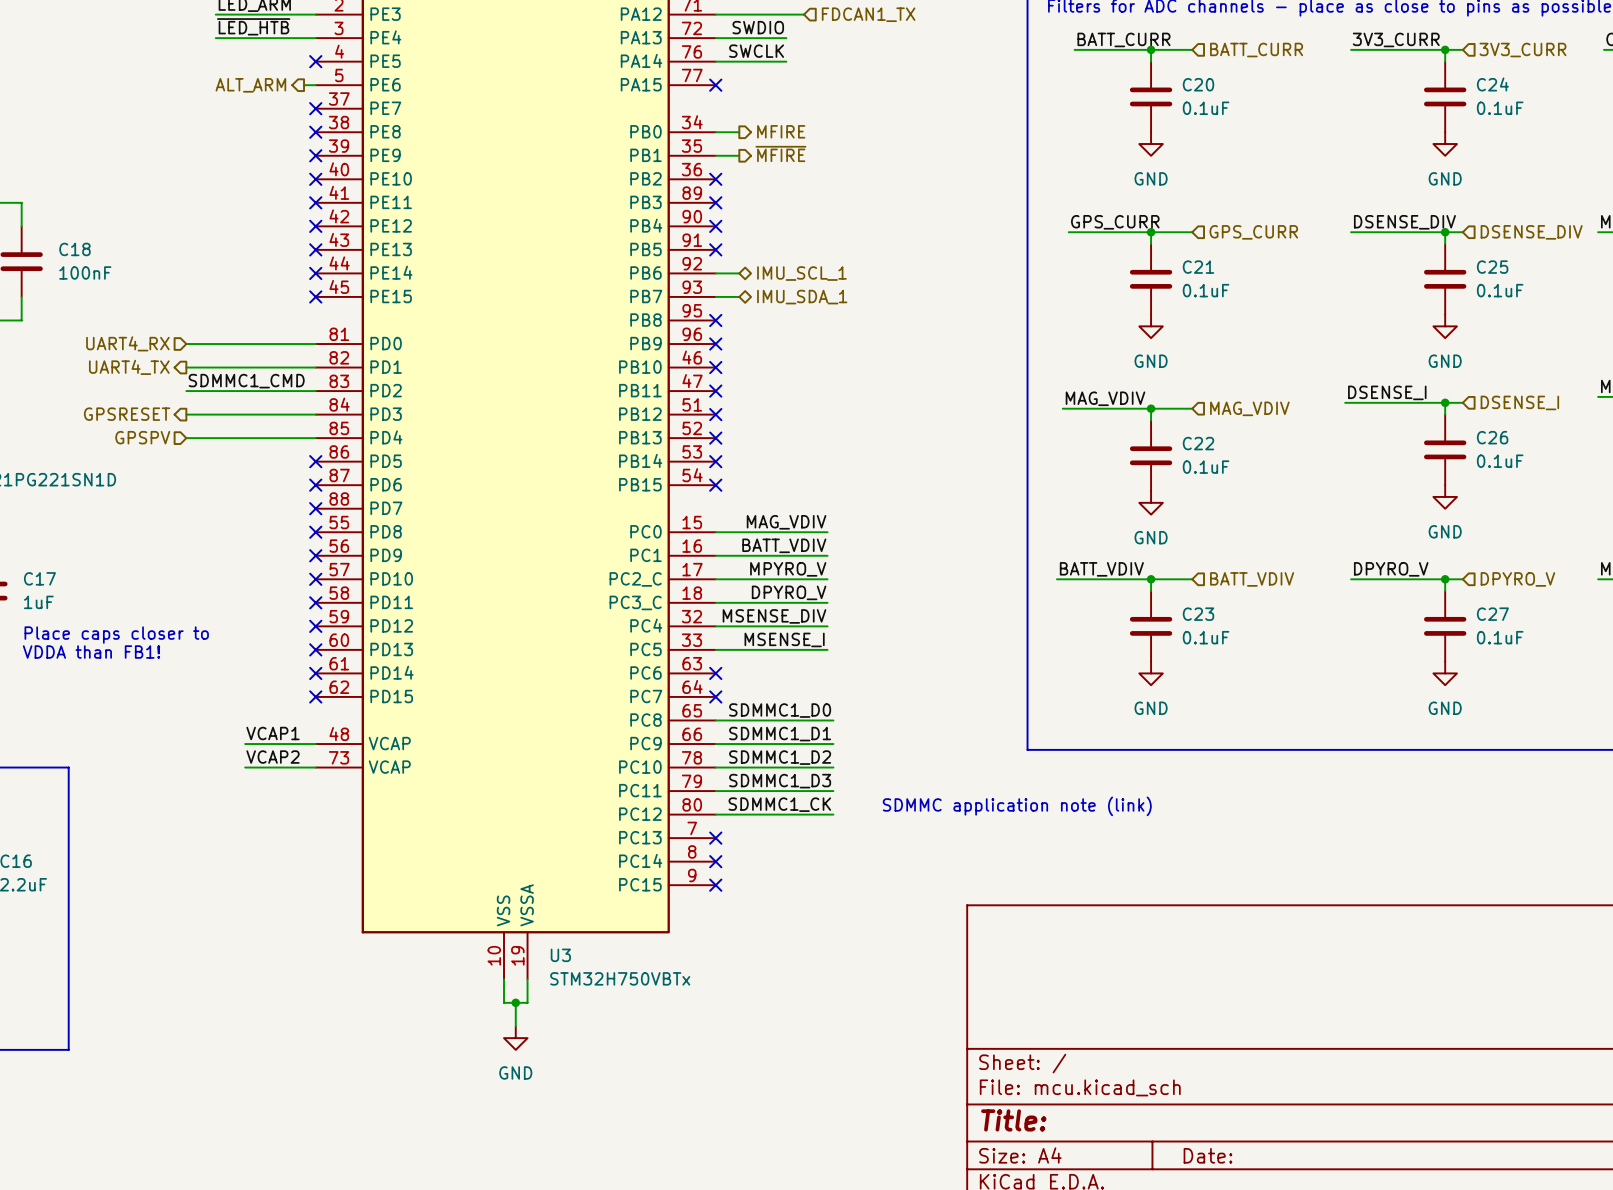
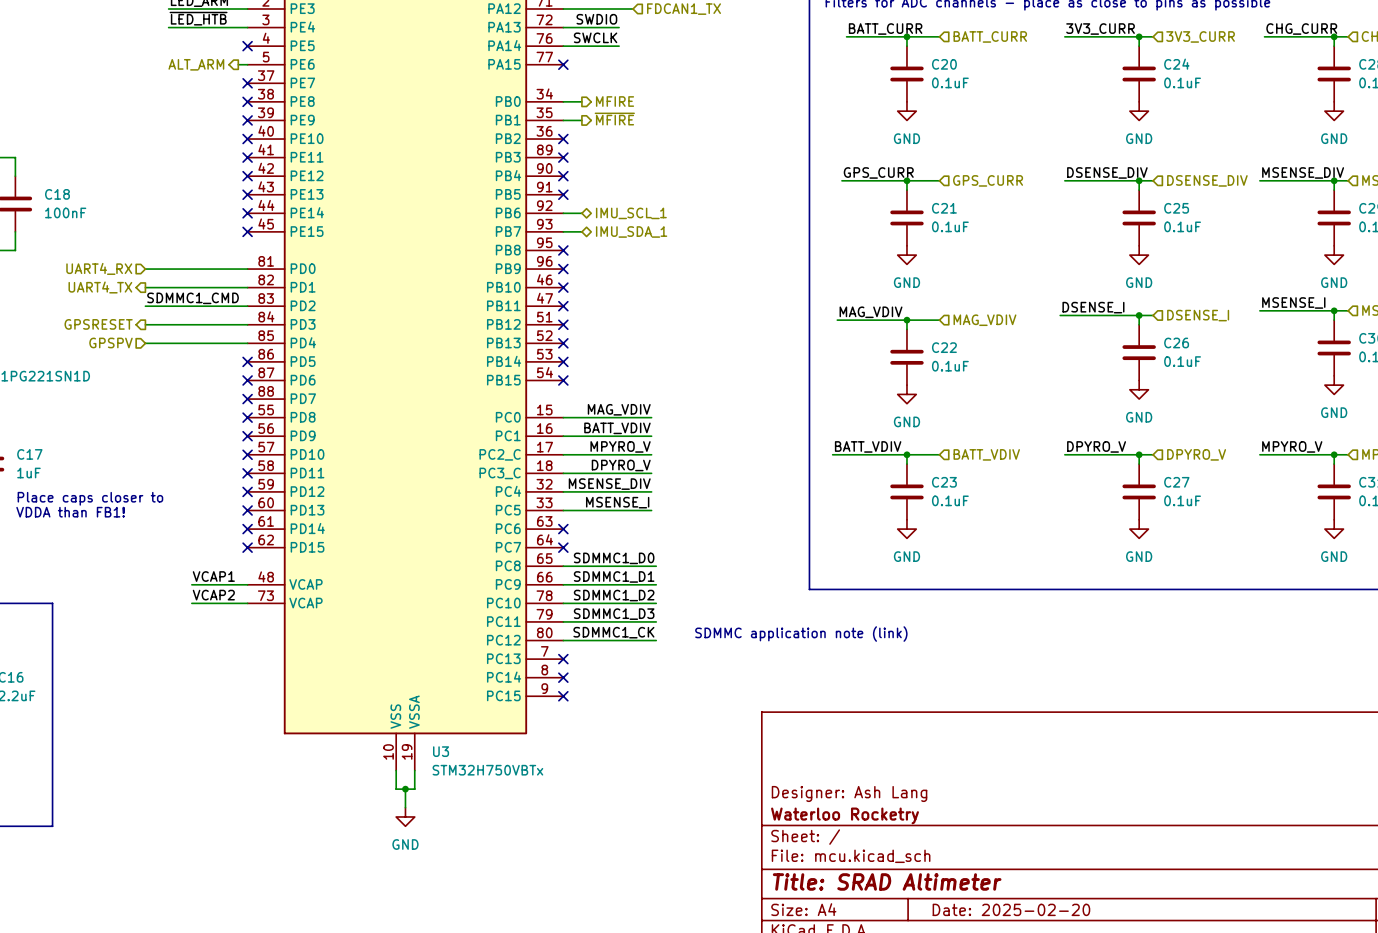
title block: none -> Designer: Ash Lang (849, 793)
title block: none -> Waterloo Rocketry (845, 815)
title block: Title: (1013, 1120) -> Title: SRAD Altimeter (887, 881)
title block: Date: (1207, 1155) -> Date: 2025-02-20 (1011, 909)

